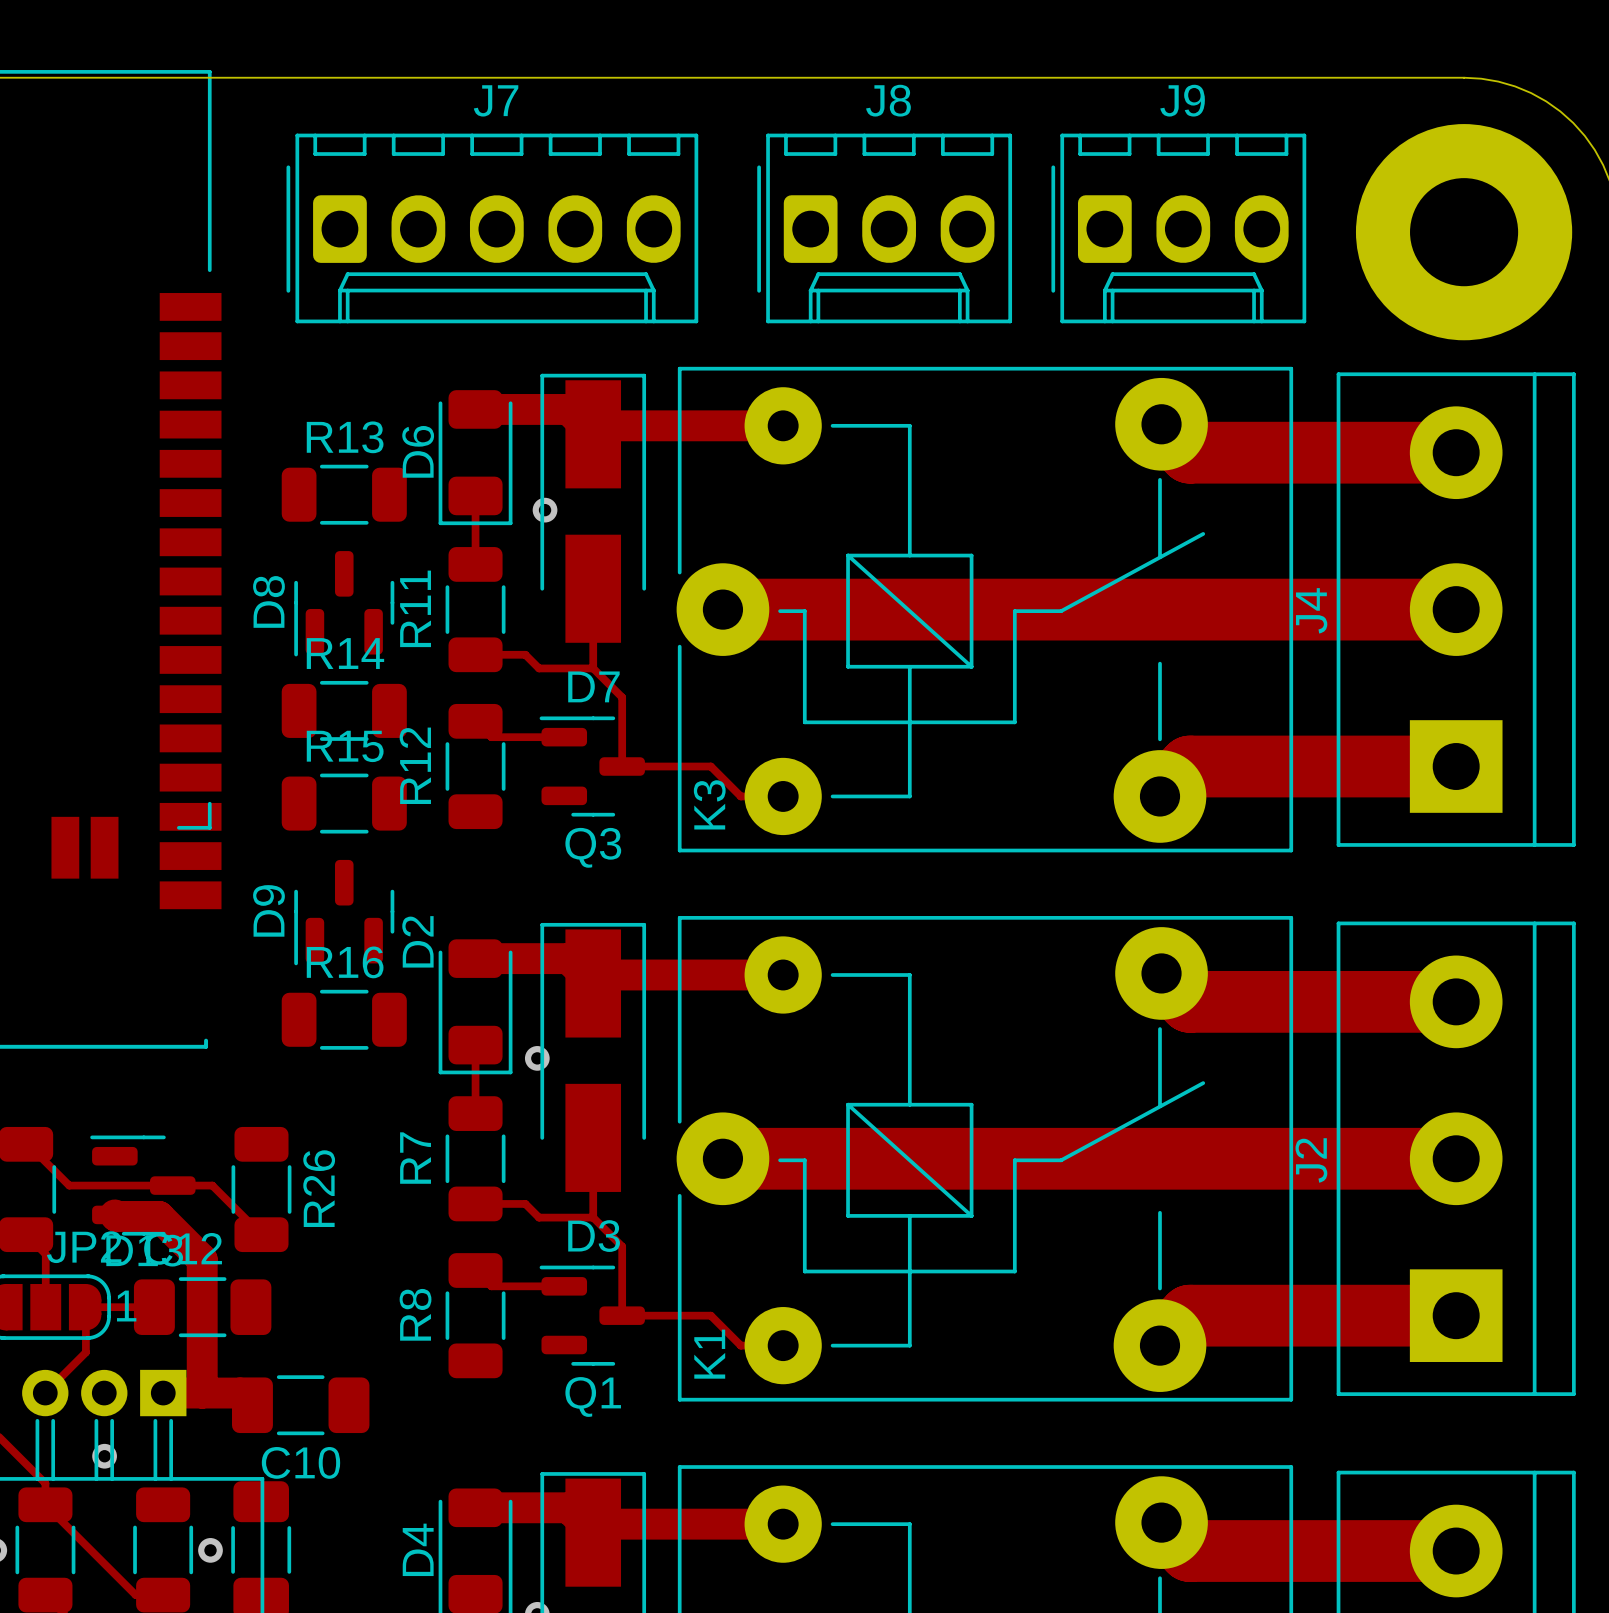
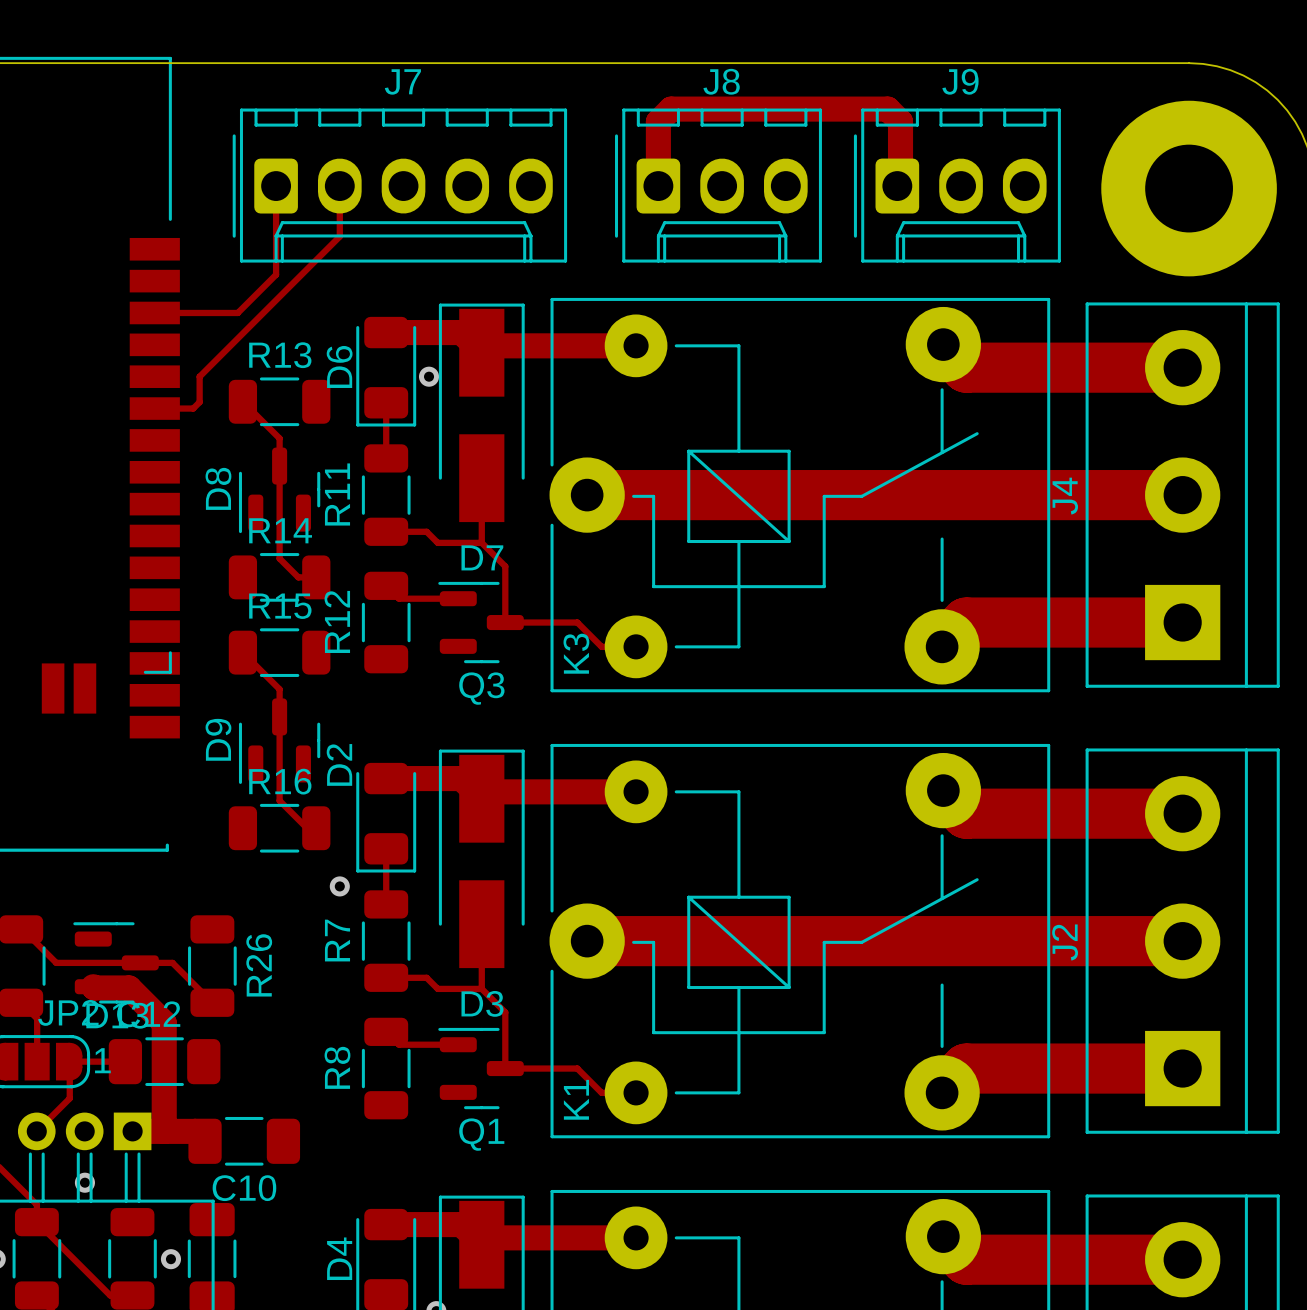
track: none -> (276, 186) (276, 274) (237, 312) (154, 312)
track: none -> (339, 186) (339, 236) (199, 376) (199, 402) (193, 408) (154, 408)
track: none -> (658, 186) (658, 121) (671, 109) (887, 109) (900, 121) (900, 182) (897, 186)
track: none -> (242, 401) (279, 438) (279, 558) (298, 577) (316, 577)
via position: (545, 510) -> (429, 376)
track: none -> (242, 652) (279, 689) (279, 800) (307, 828) (316, 828)
via position: (537, 1058) -> (339, 886)

